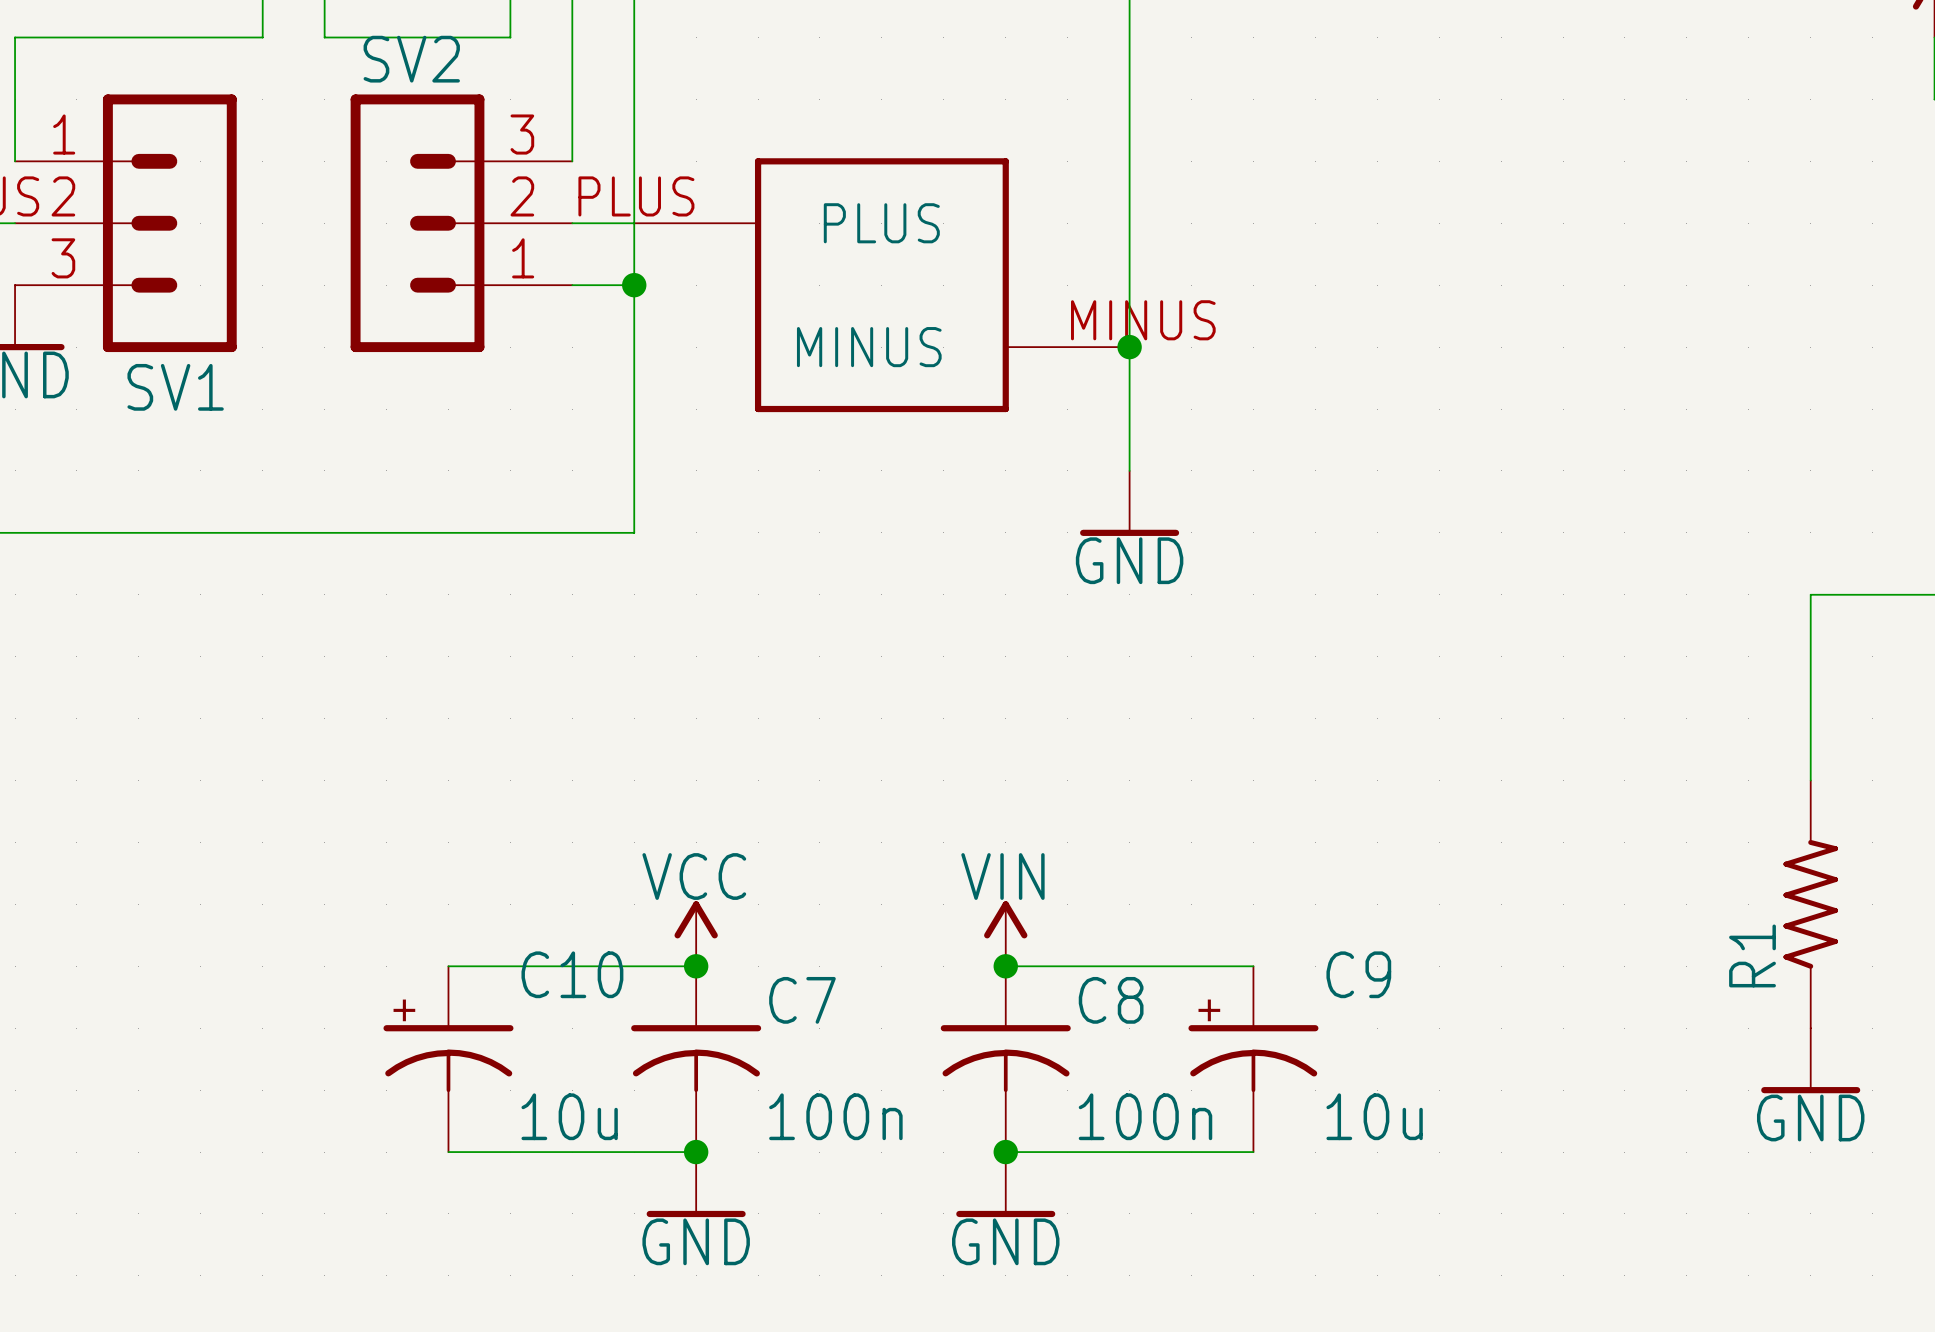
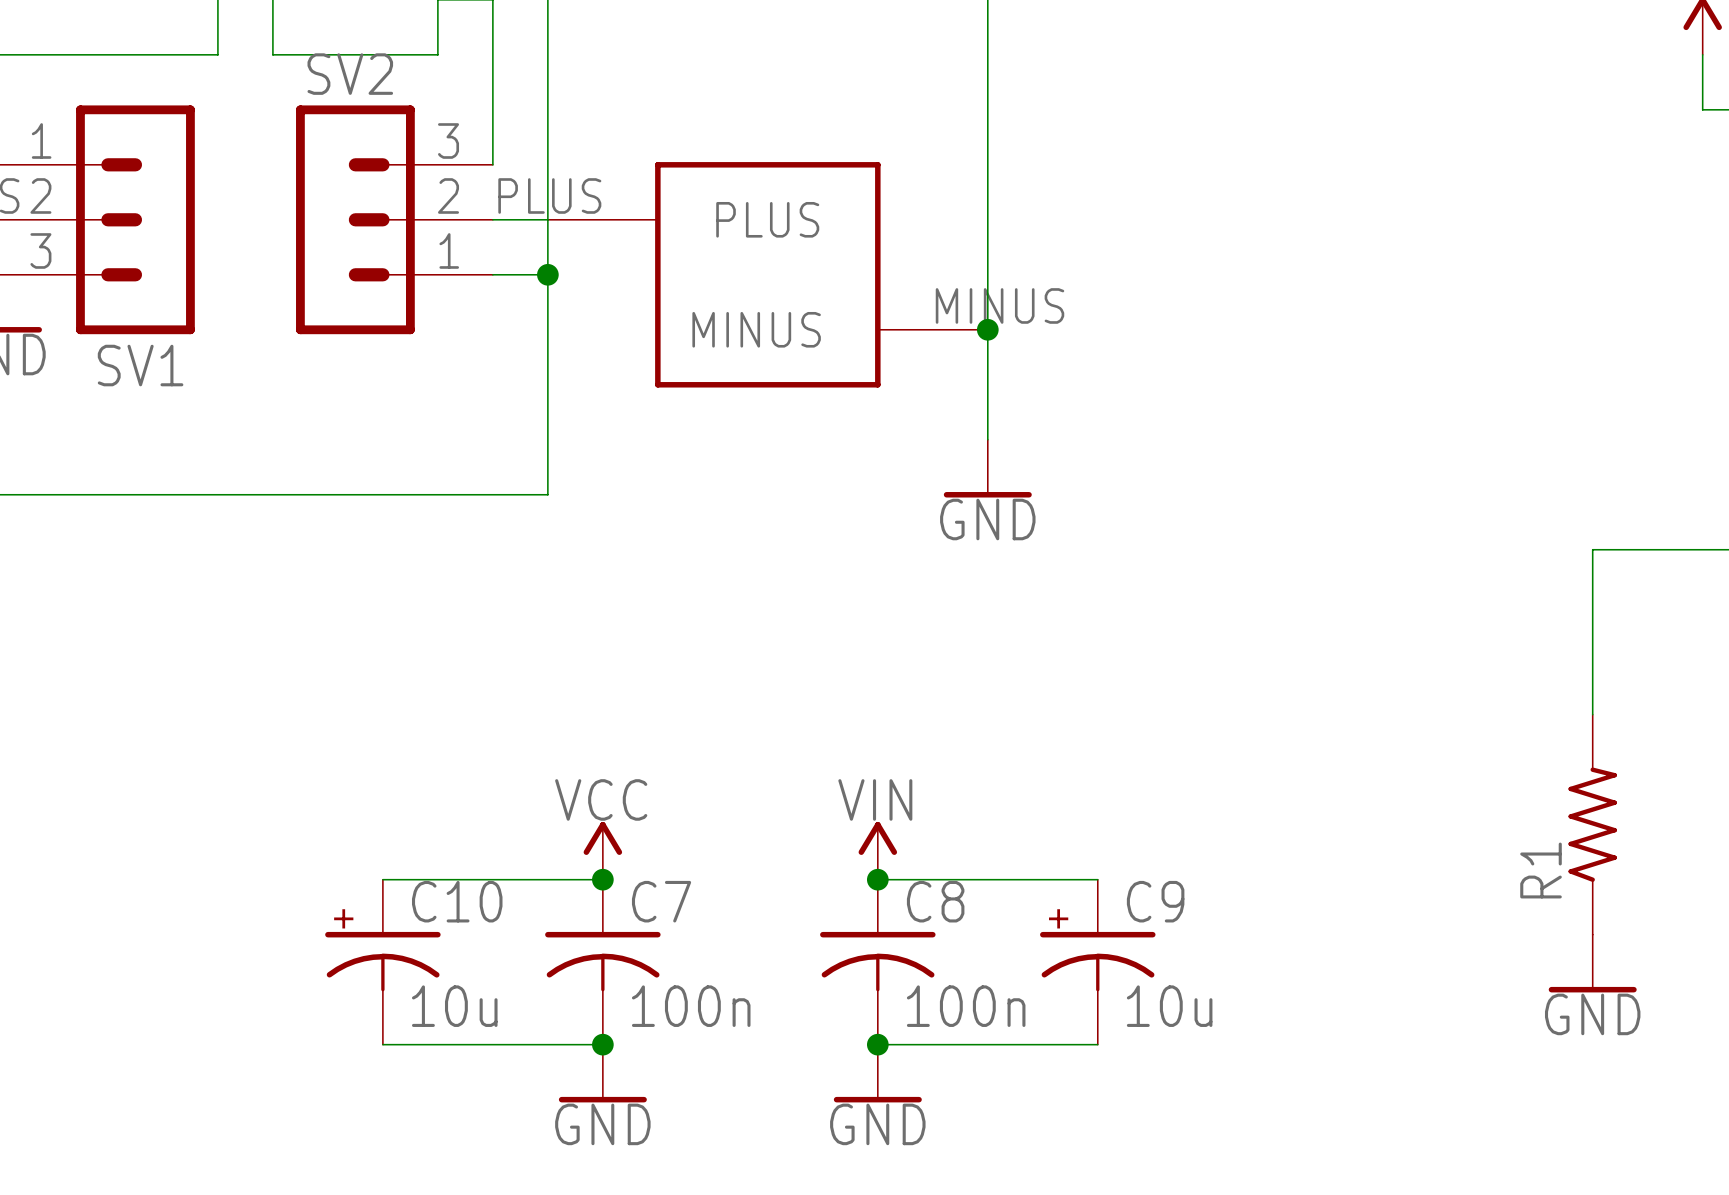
C10 name position: C10 (572, 974) -> C10 (457, 901)
C9 name position: C9 (1358, 974) -> C9 (1155, 901)
C7 name position: C7 (802, 1000) -> C7 (661, 901)
C8 name position: C8 (1111, 1000) -> C8 (935, 901)
C10 value position: 10u (569, 1116) -> 10u (454, 1006)
C7 value position: 100n (835, 1116) -> 100n (691, 1006)
C8 value position: 100n (1145, 1116) -> 100n (966, 1006)
C9 value position: 10u (1374, 1116) -> 10u (1169, 1006)

